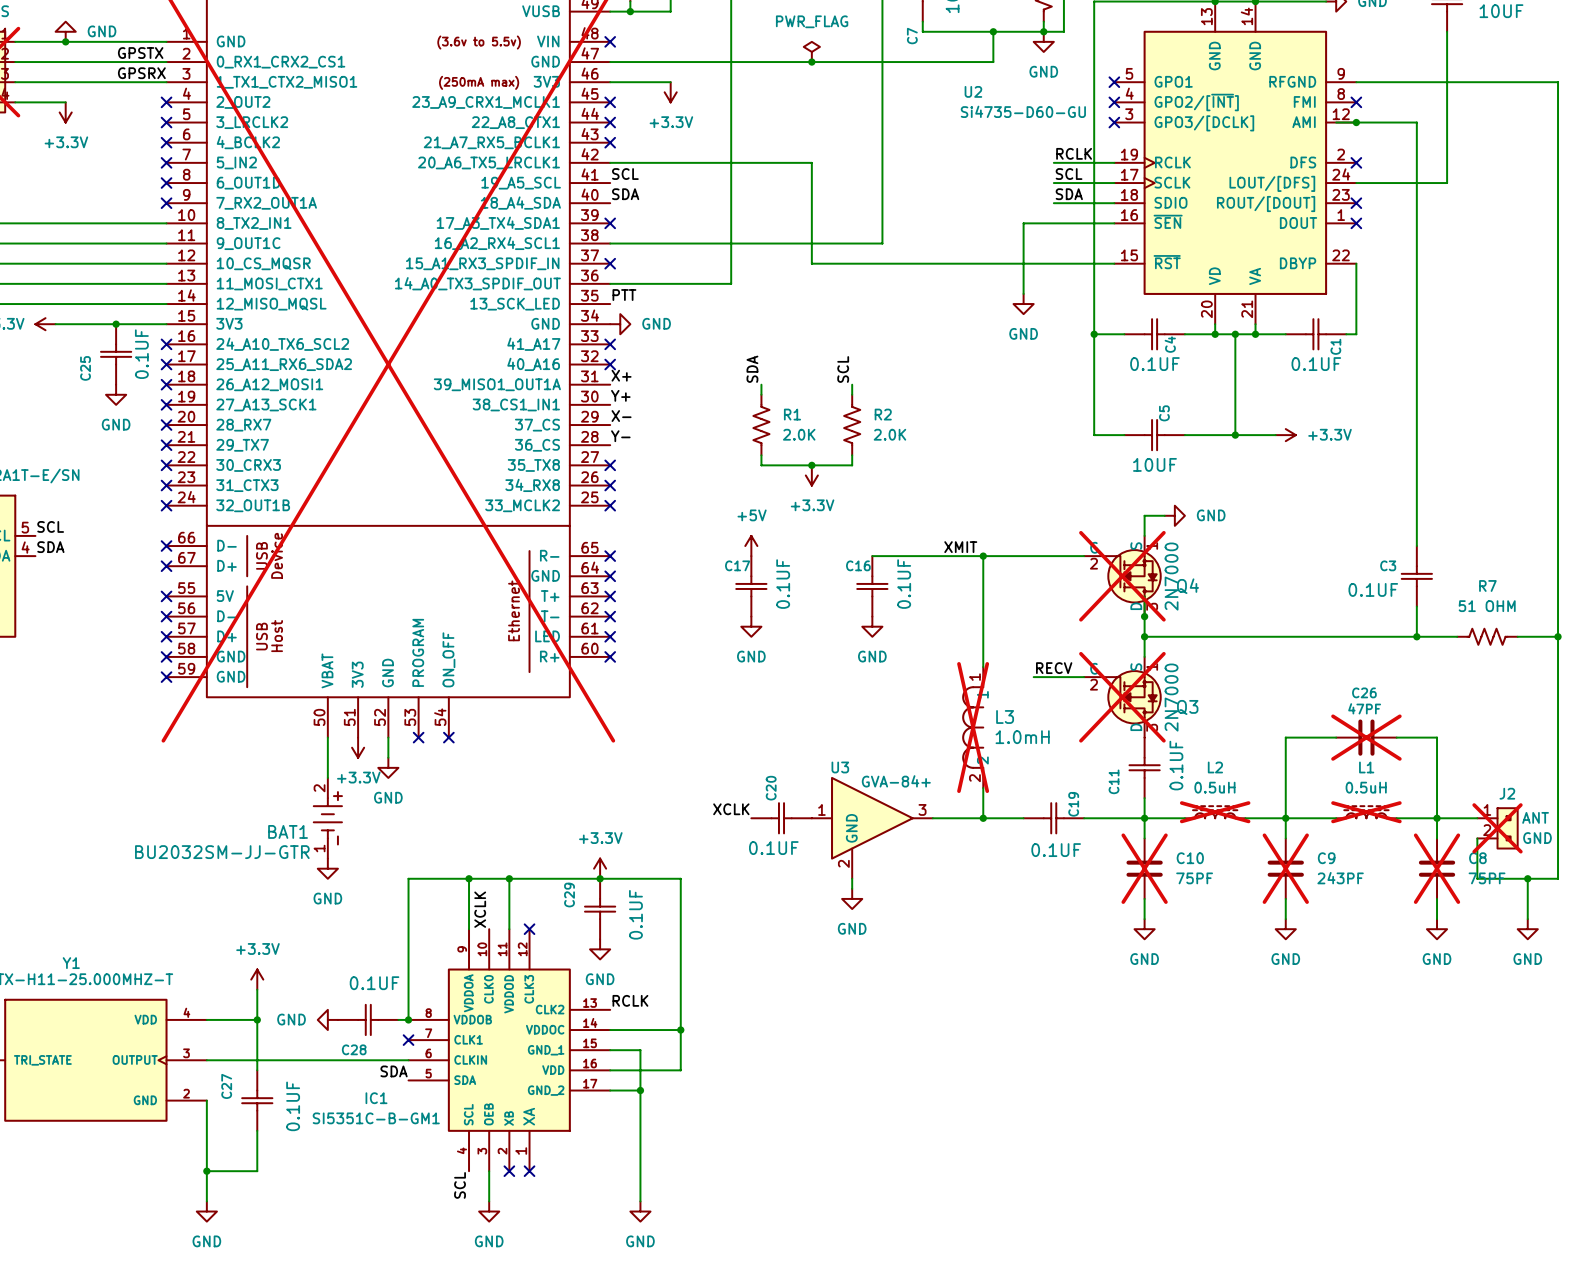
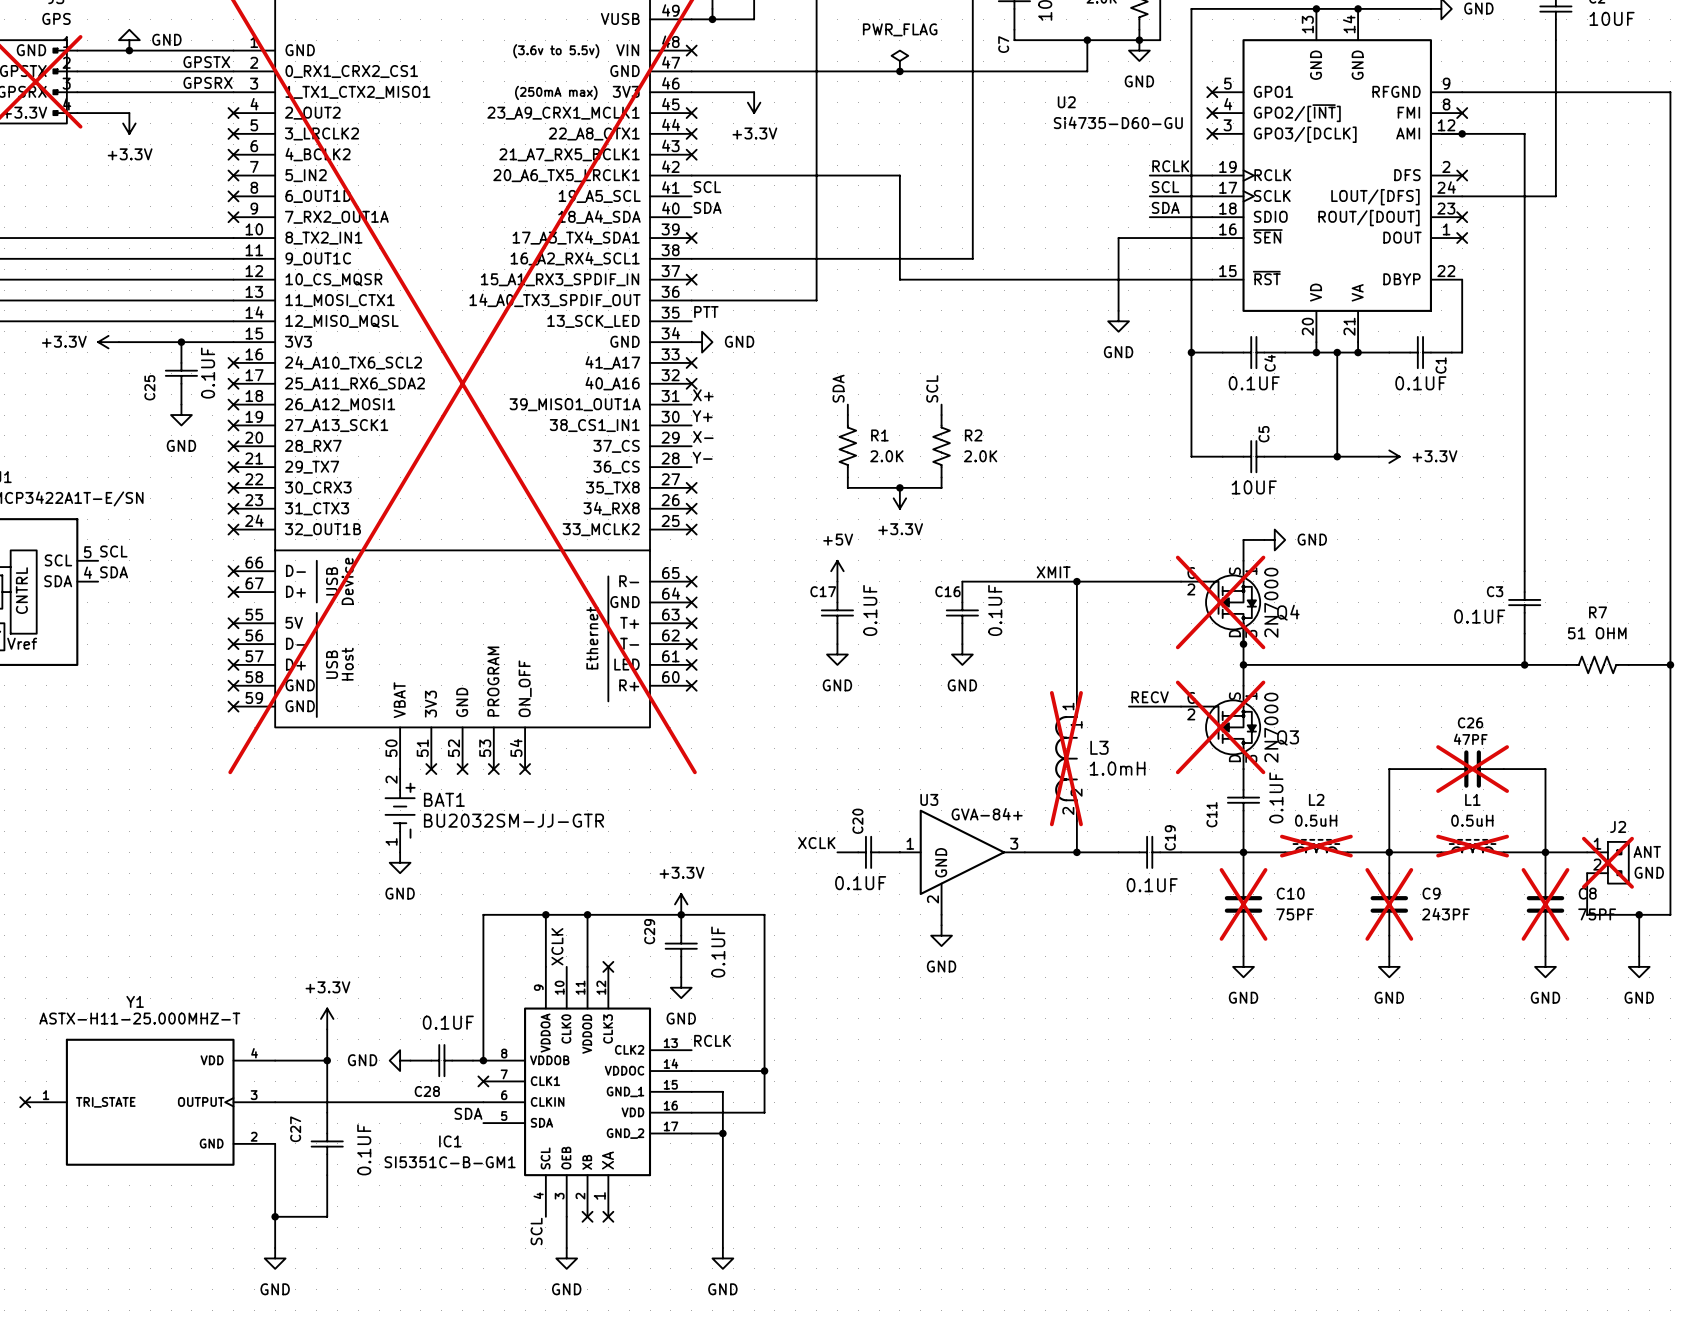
no-connect mark: none -> (431, 769)
wire: (388, 737) (388, 757) -> none
no-connect mark: none -> (462, 769)
power symbol: +3.3V (358, 747) -> none
power symbol: GND (388, 767) -> none
BAT1 position: (327, 818) -> (400, 810)
BAT1 name position: BAT1 (288, 831) -> BAT1 (444, 799)
BAT1 value position: BU2032SM-JJ-GTR (222, 852) -> BU2032SM-JJ-GTR (513, 820)
power symbol position: GND (327, 868) -> GND (400, 862)

